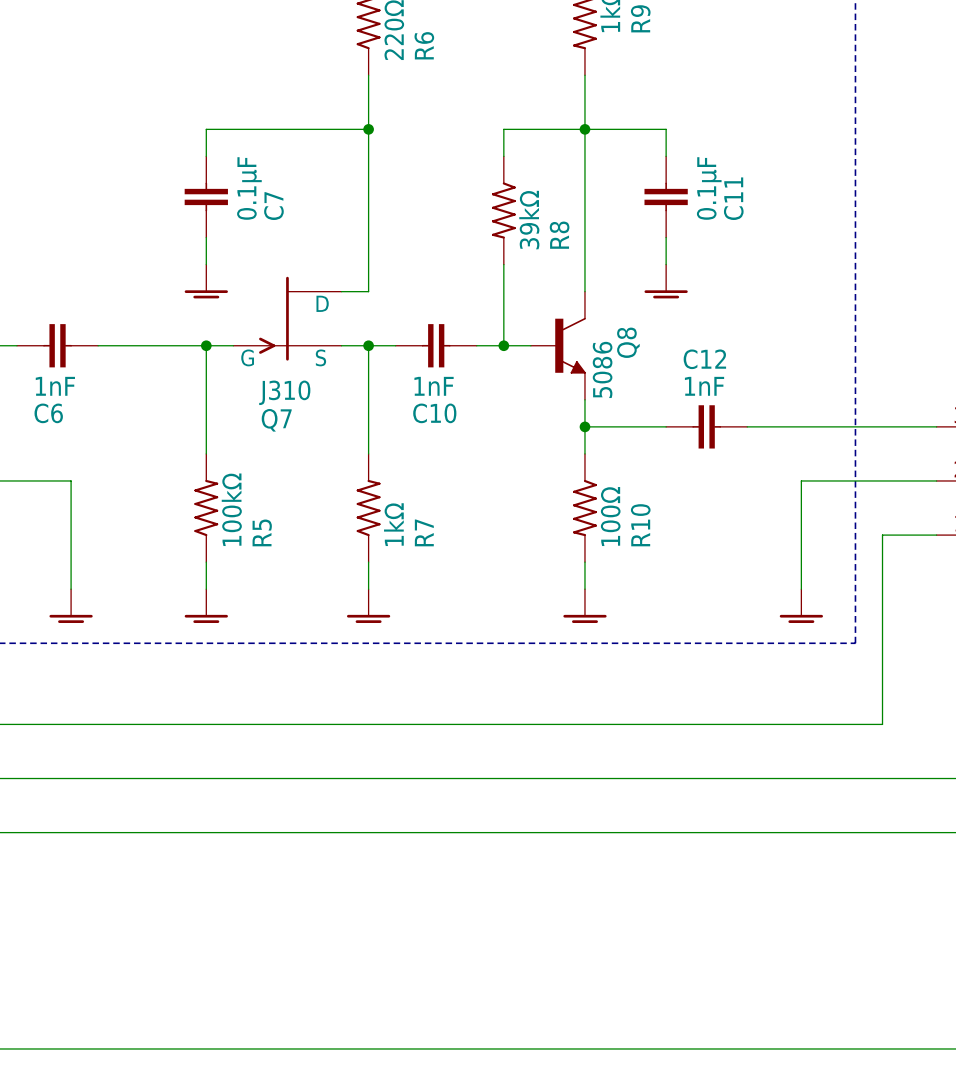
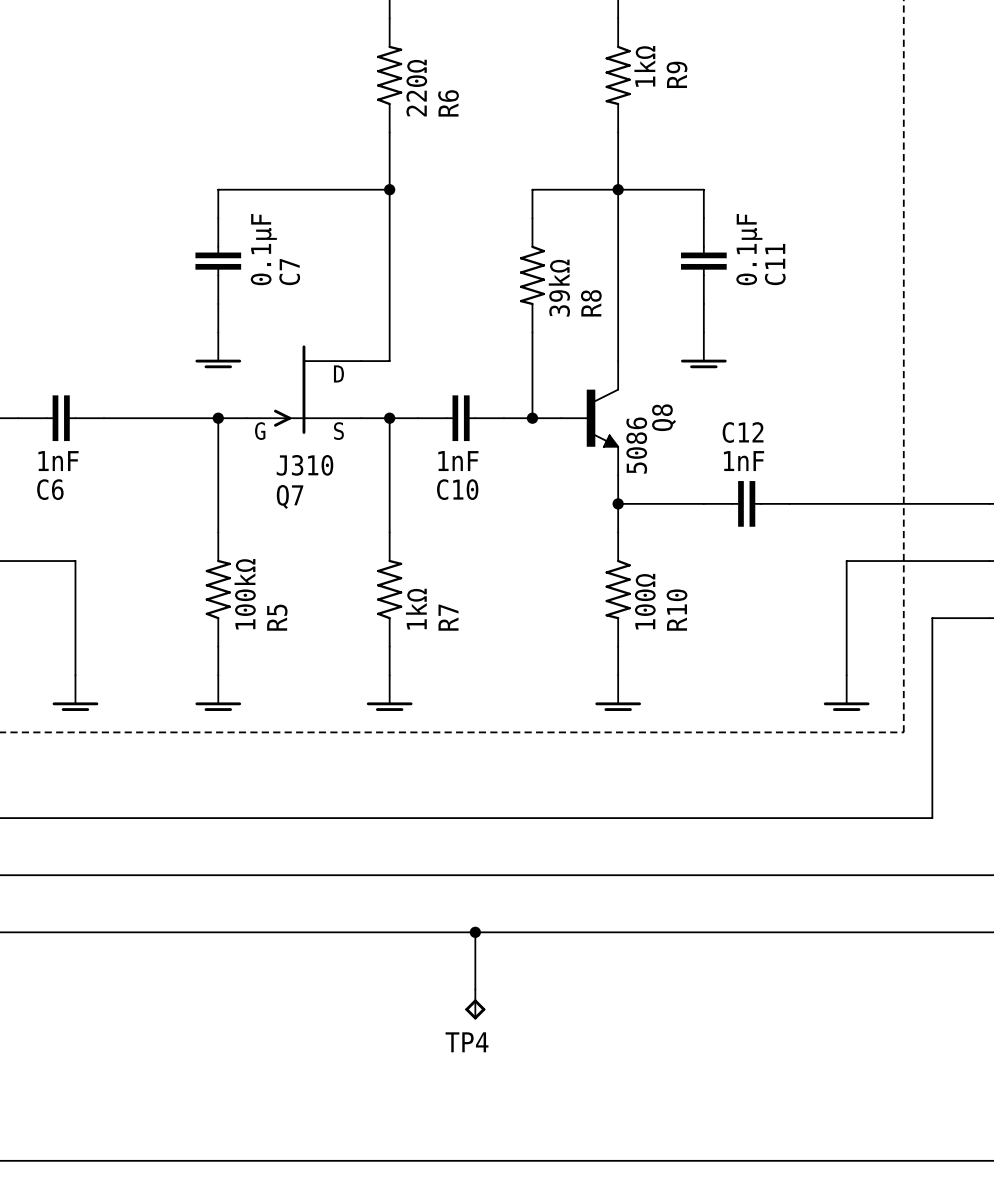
wire: none -> (475, 932) (475, 989)
junction: none -> (475, 932)
TP4: none -> (475, 1004)

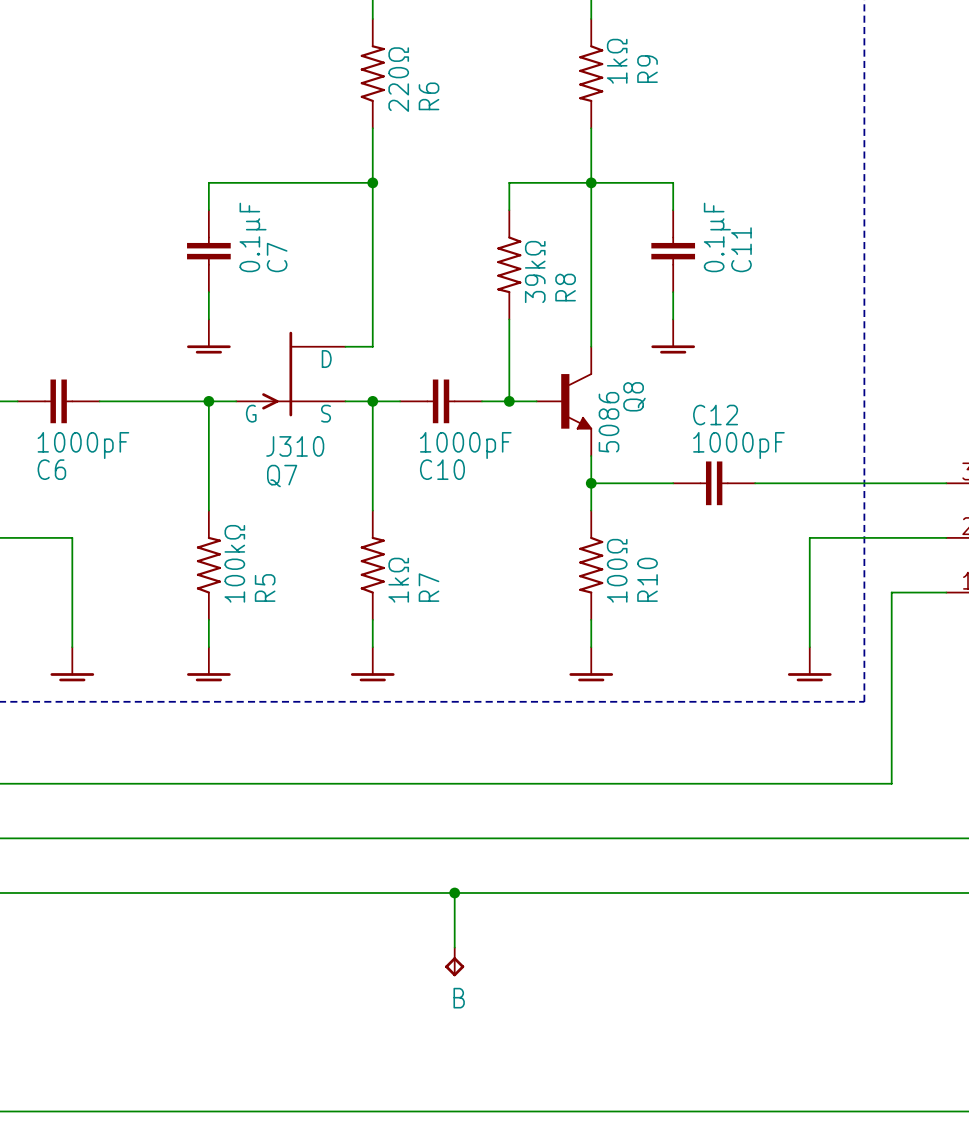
C6 value: 1nF (58, 461) -> 1000pF (83, 445)
C10 value: 1nF (458, 461) -> 1000pF (465, 445)
C12 value: 1nF (744, 461) -> 1000pF (738, 445)
TP4 name: TP4 (467, 1042) -> B (459, 998)

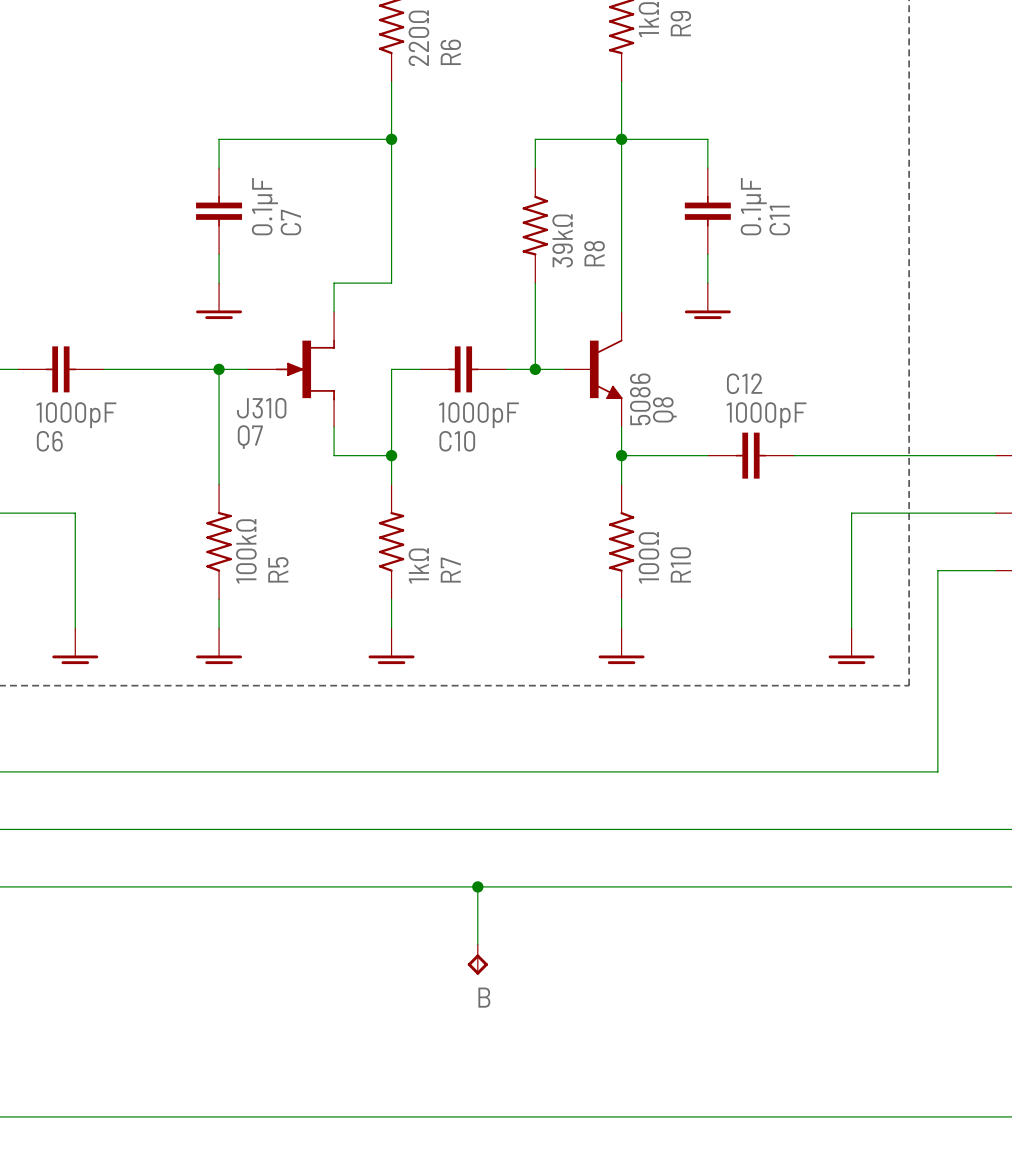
wire: (372, 319) (372, 346) (345, 346) -> (391, 283) (334, 283) (334, 311)
Q7 symbol: [236, 331, 346, 417] -> [247, 311, 335, 427]
Q8 name position: Q8 (634, 396) -> Q8 (664, 409)
wire: (345, 401) (372, 401) -> none
junction: (372, 401) -> none
Q7 value position: J310 (295, 446) -> J310 (261, 408)
wire: none -> (334, 426) (334, 455) (391, 455)
Q7 name position: Q7 (282, 476) -> Q7 (250, 437)
junction: none -> (391, 455)

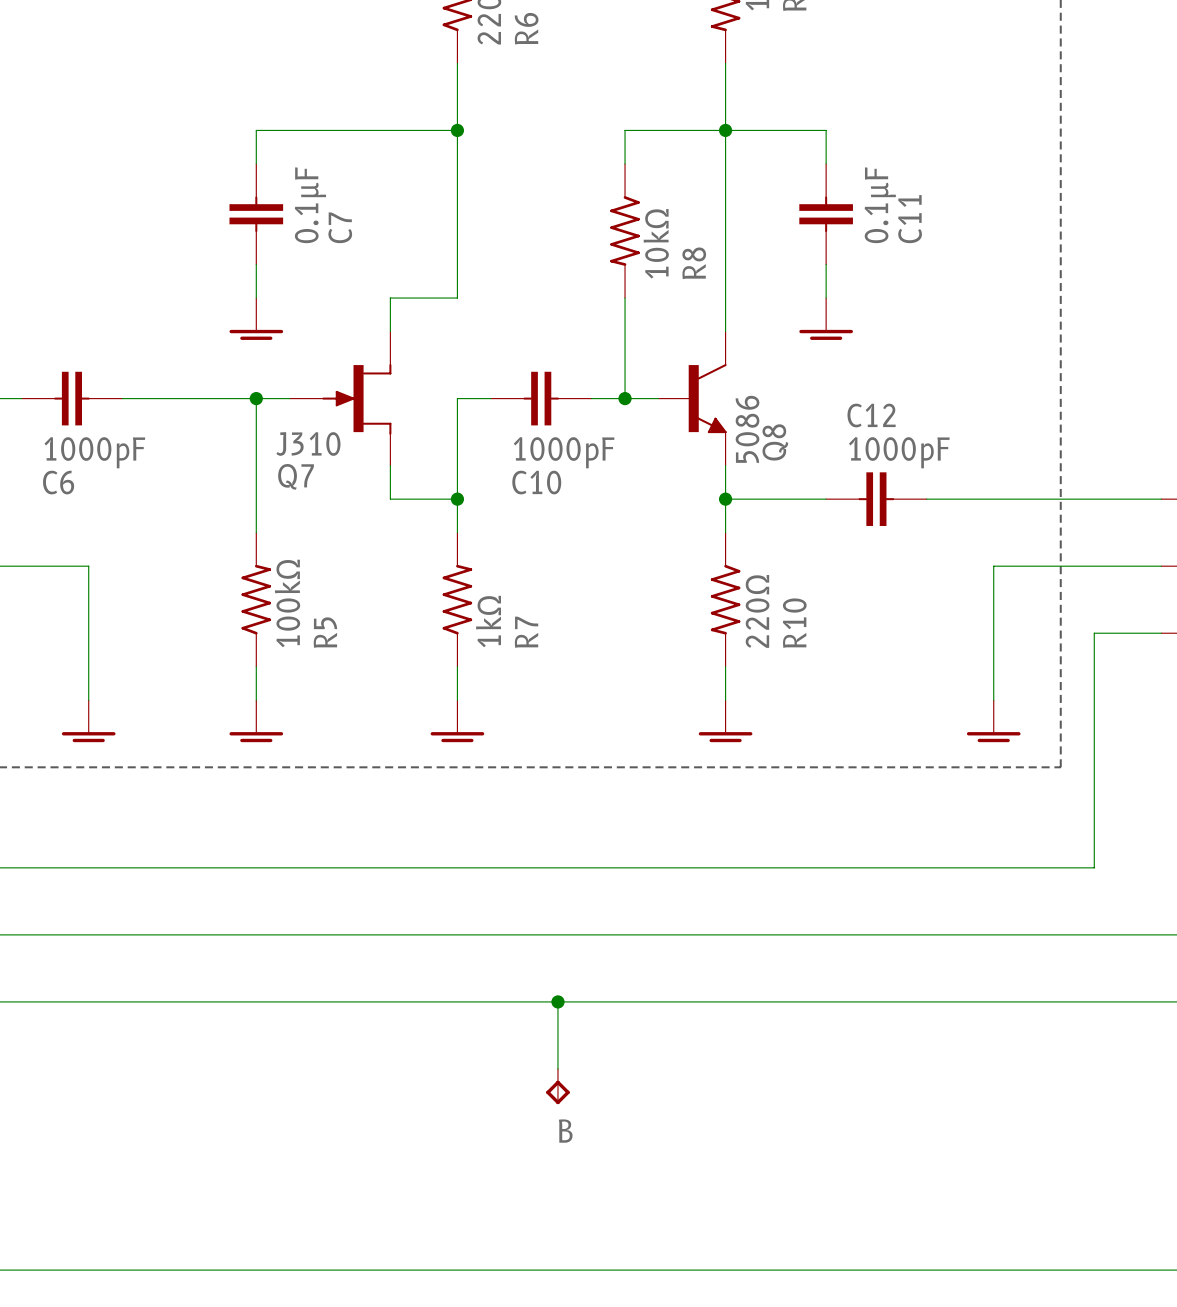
R8 value: 39kΩ (562, 240) -> 10kΩ (656, 243)
R10 value: 100Ω (648, 557) -> 220Ω (757, 611)

